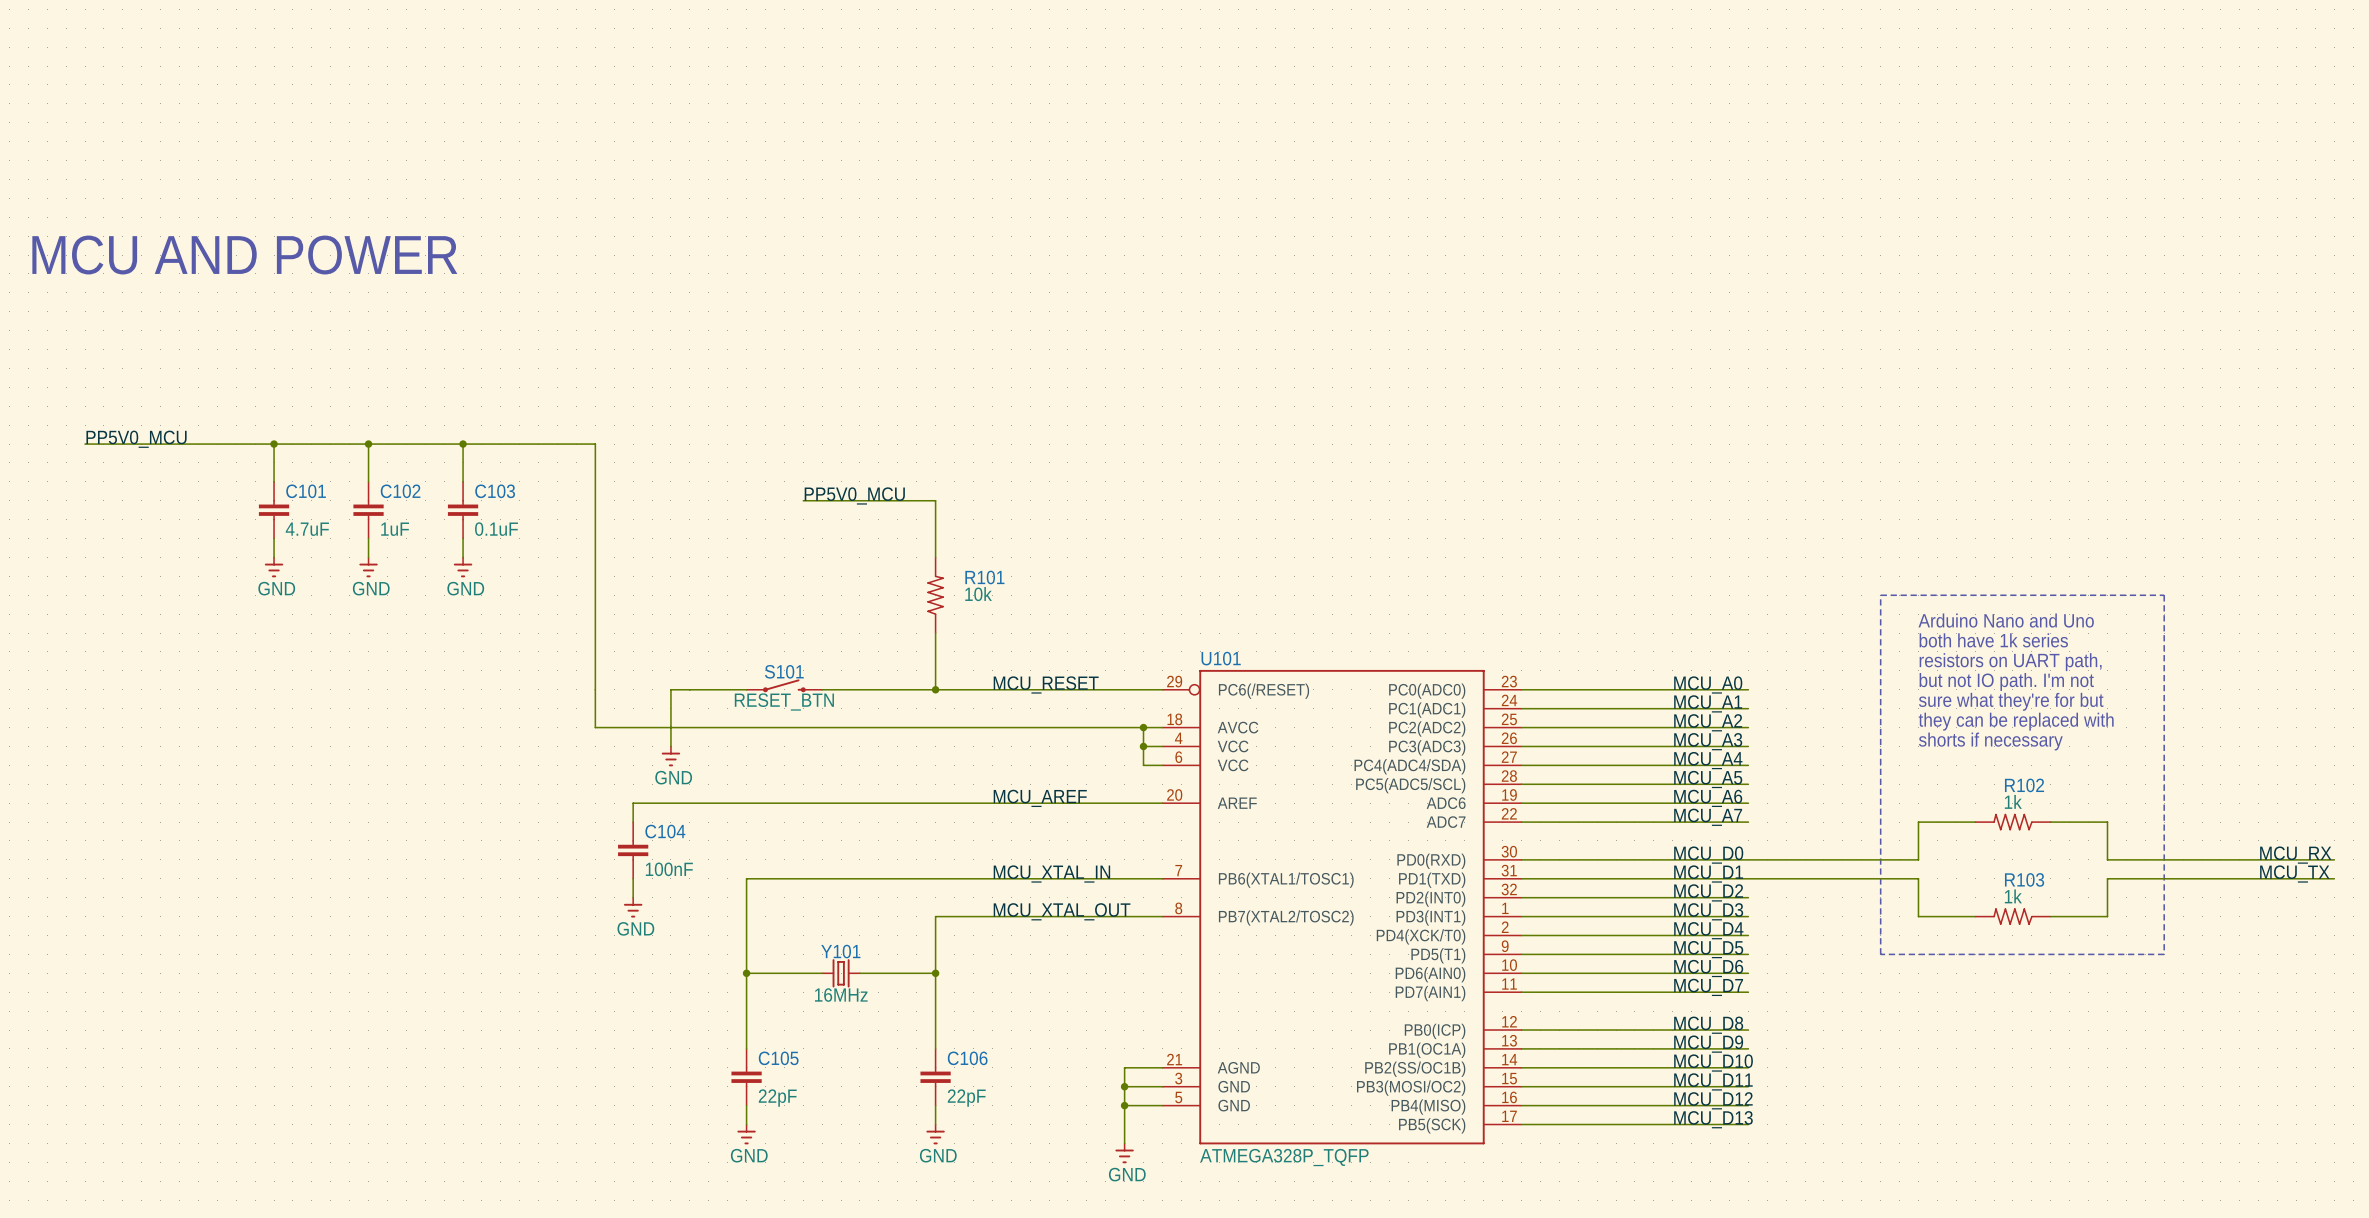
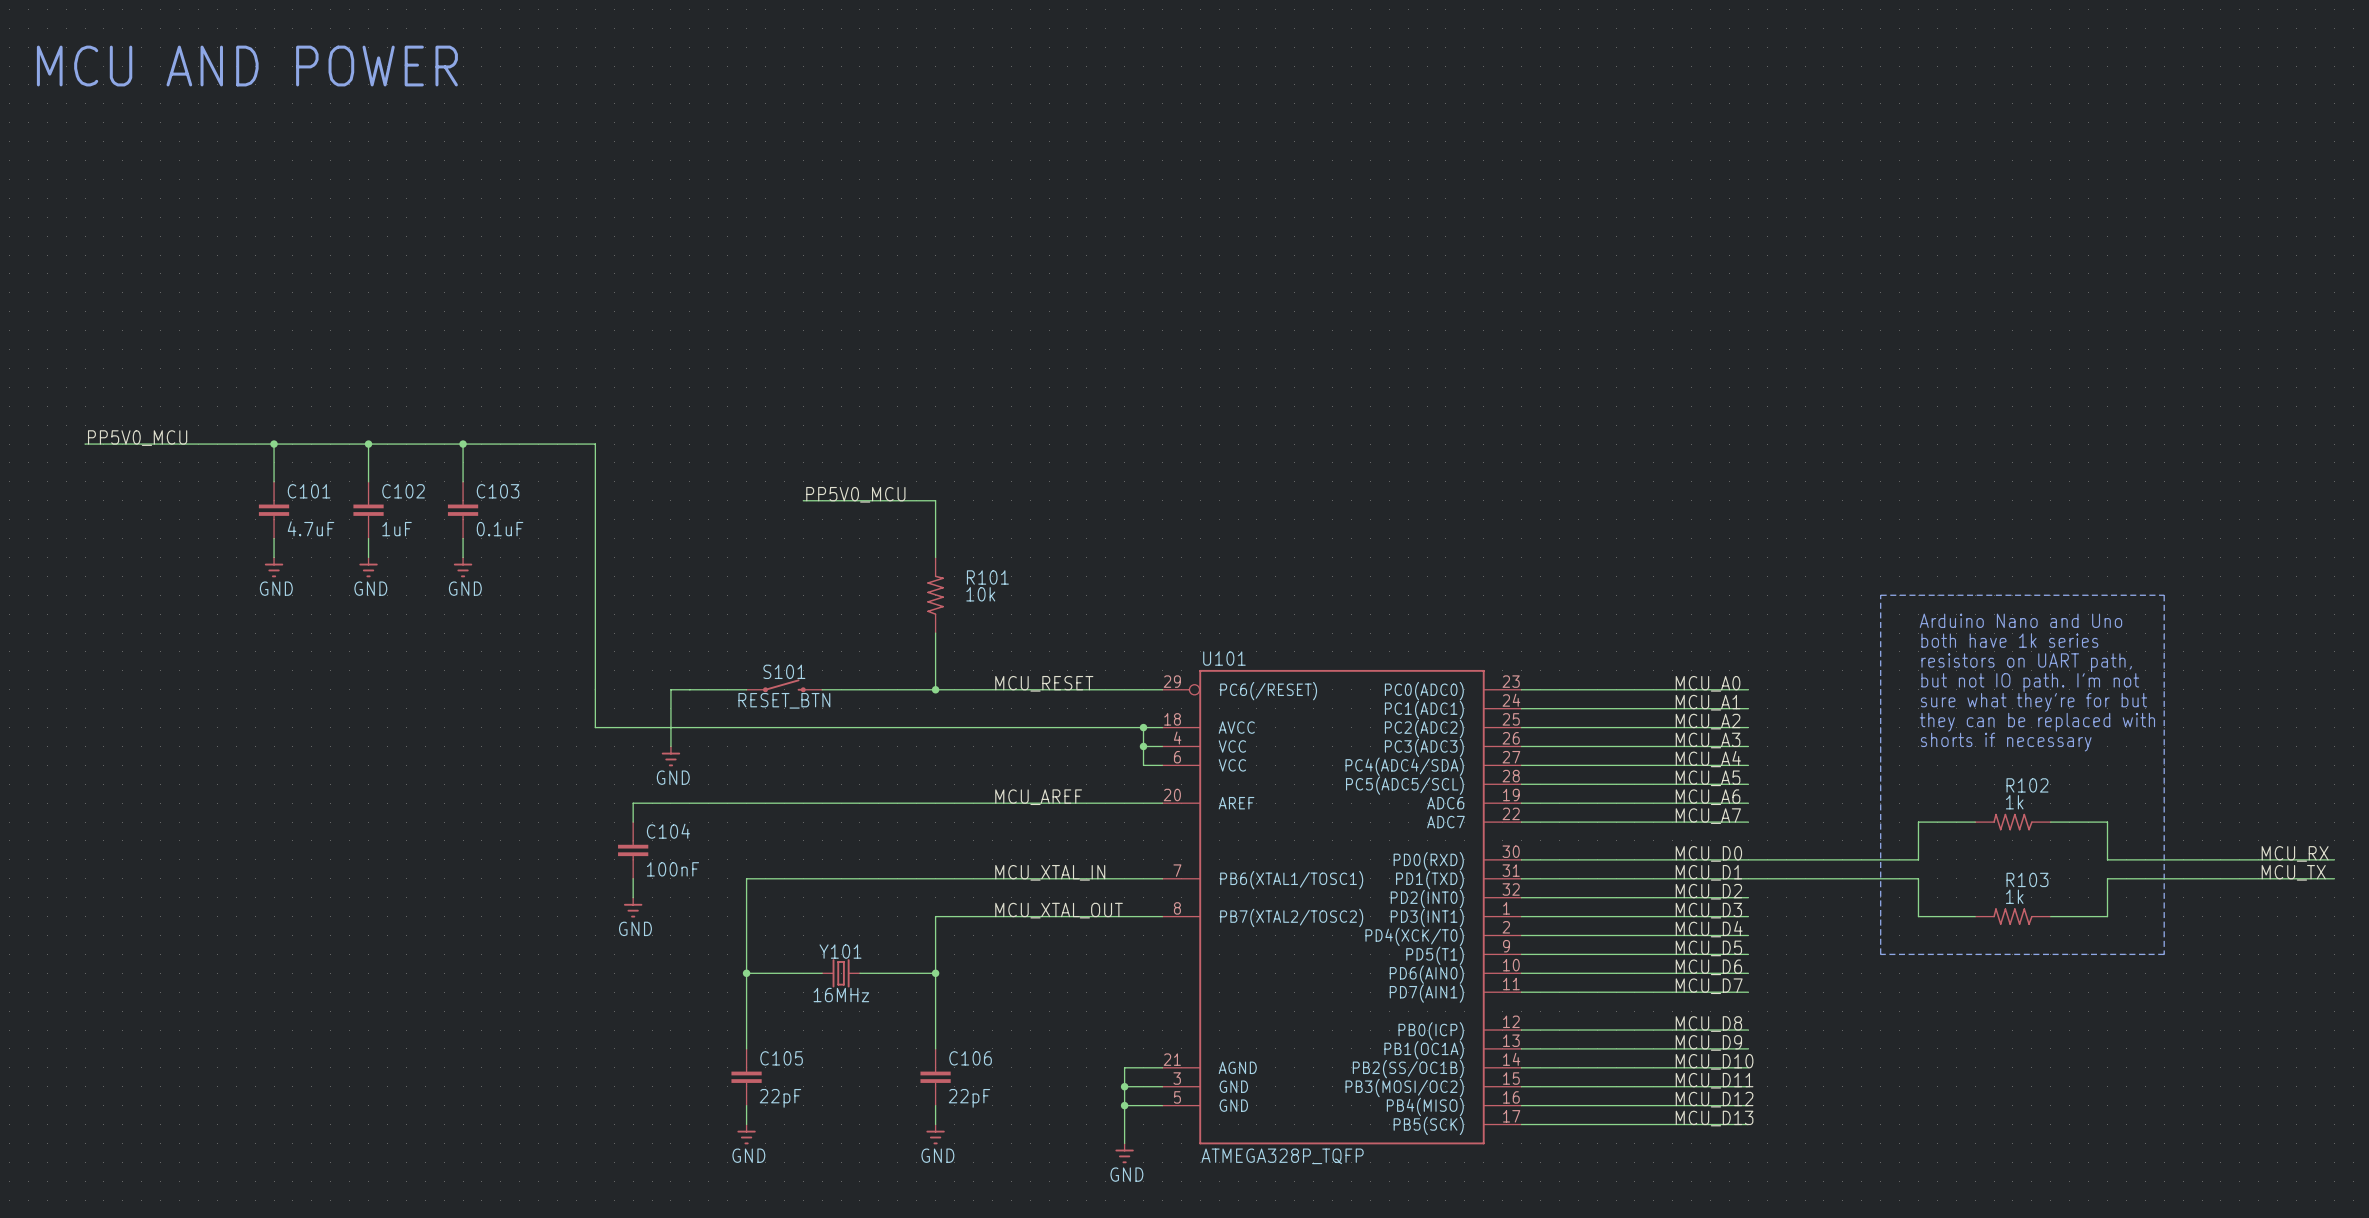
text: none -> MCU AND POWER (247, 66)
text: MCU AND POWER (244, 255) -> none

